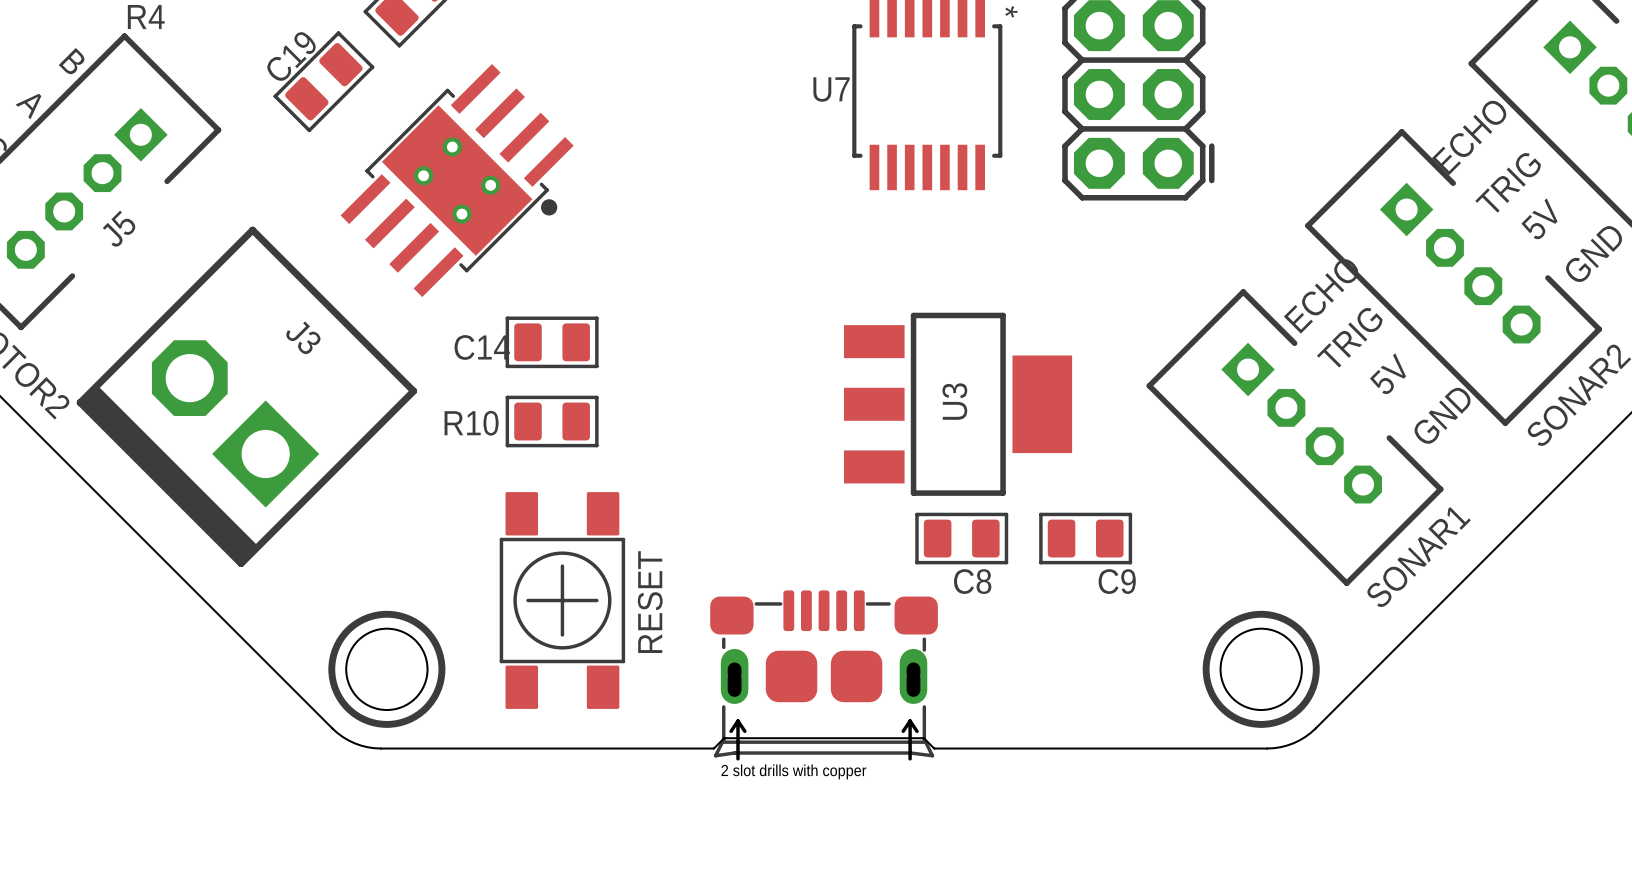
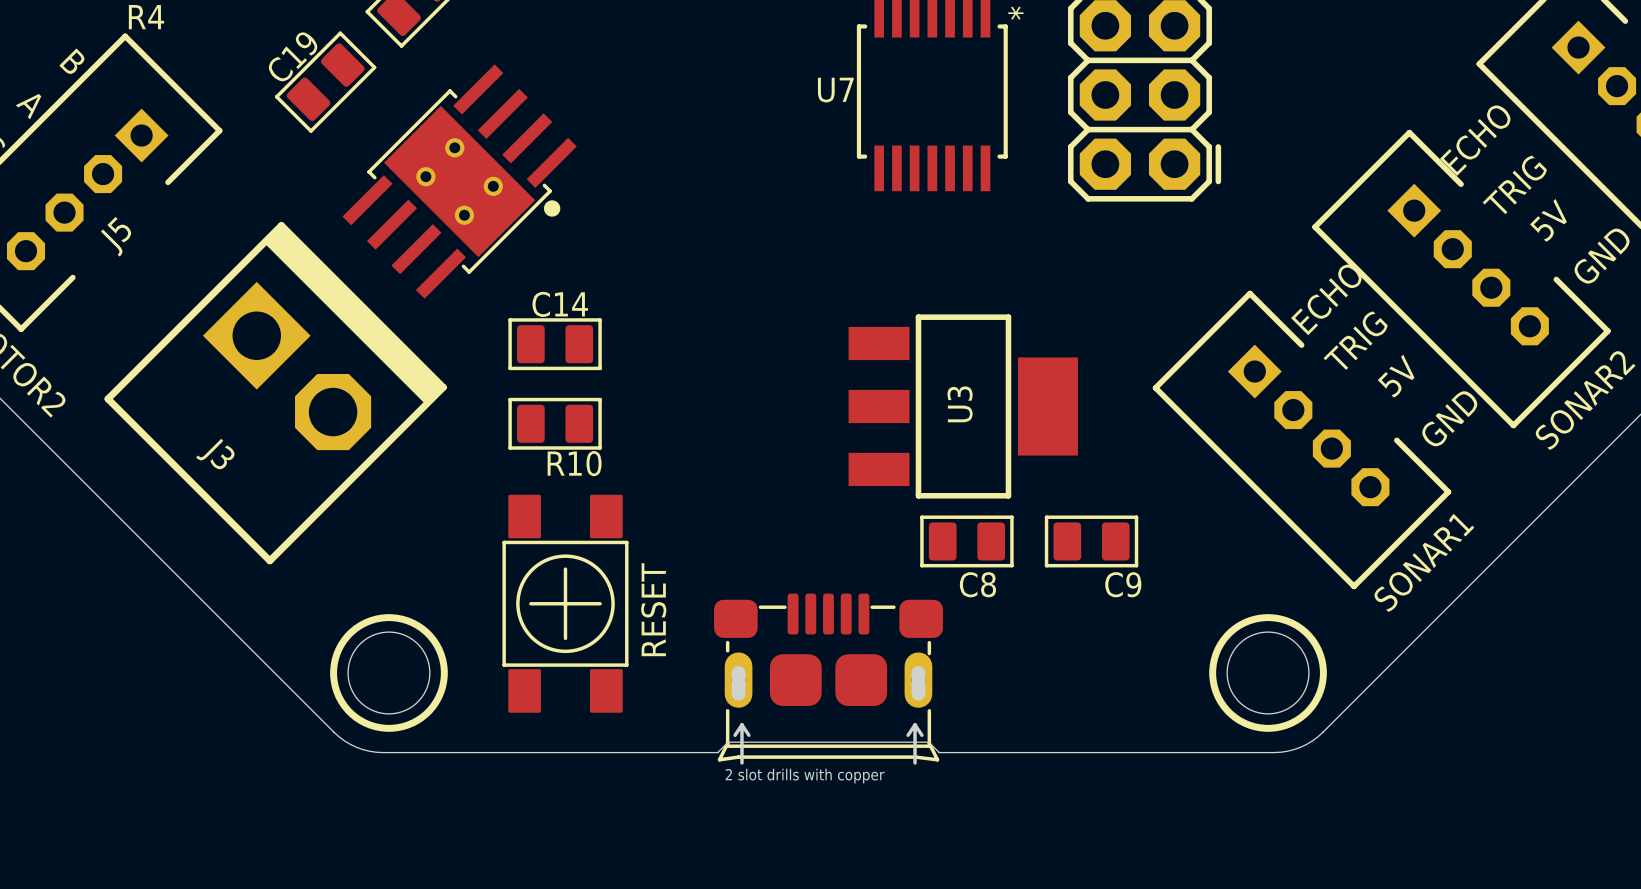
C14 name position: C14 (482, 347) -> C14 (560, 304)
J3 rotation: 0° (246, 396) -> 180° (275, 393)
R10 name position: R10 (471, 423) -> R10 (574, 463)

